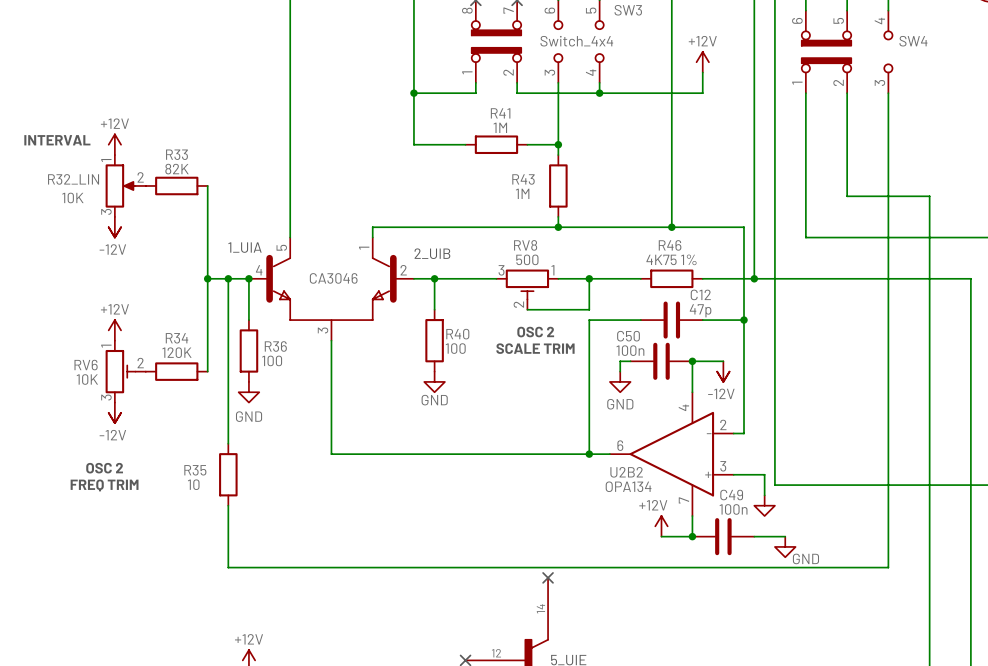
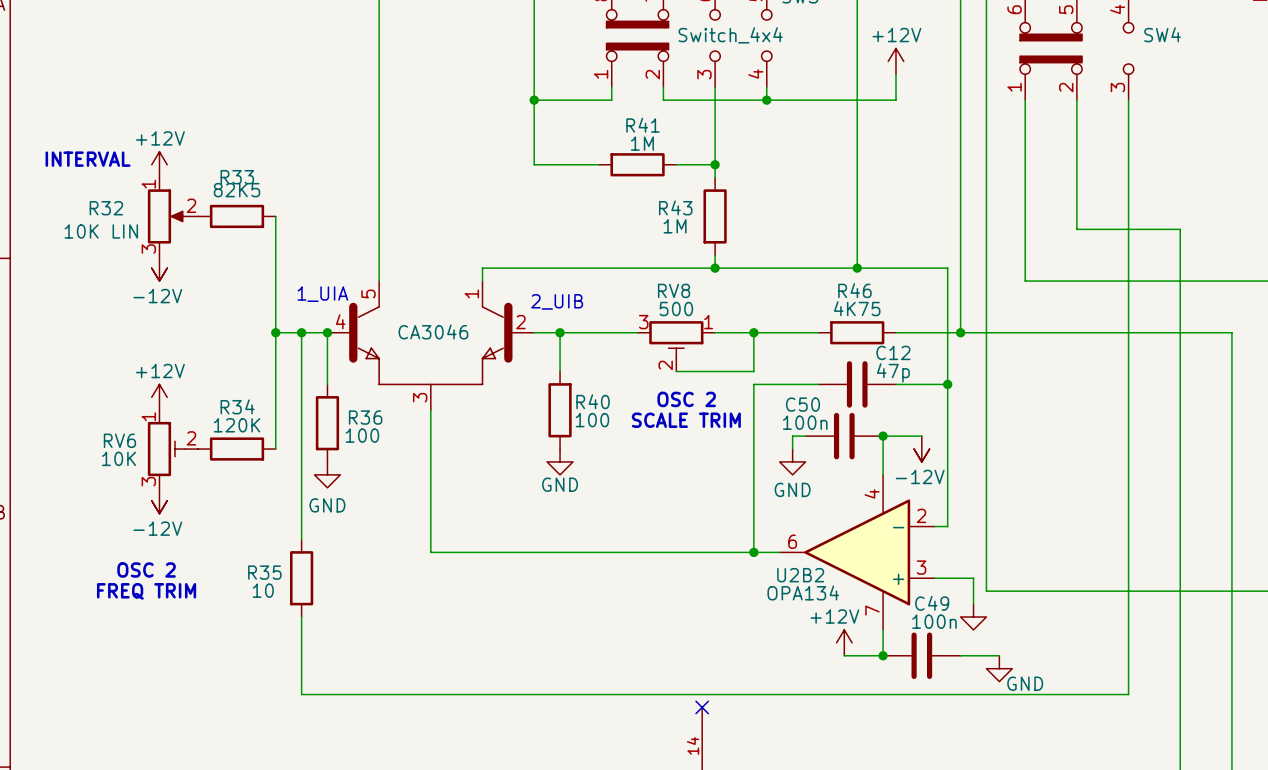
R33 value: 82K (177, 169) -> 82K5 (237, 190)
R32_LIN name: R32_LIN (73, 179) -> R32 (106, 208)
R32_LIN value: 10K (72, 197) -> 10K LIN (101, 231)
R46 value: 4K75 1% (671, 259) -> 4K75 (857, 308)

